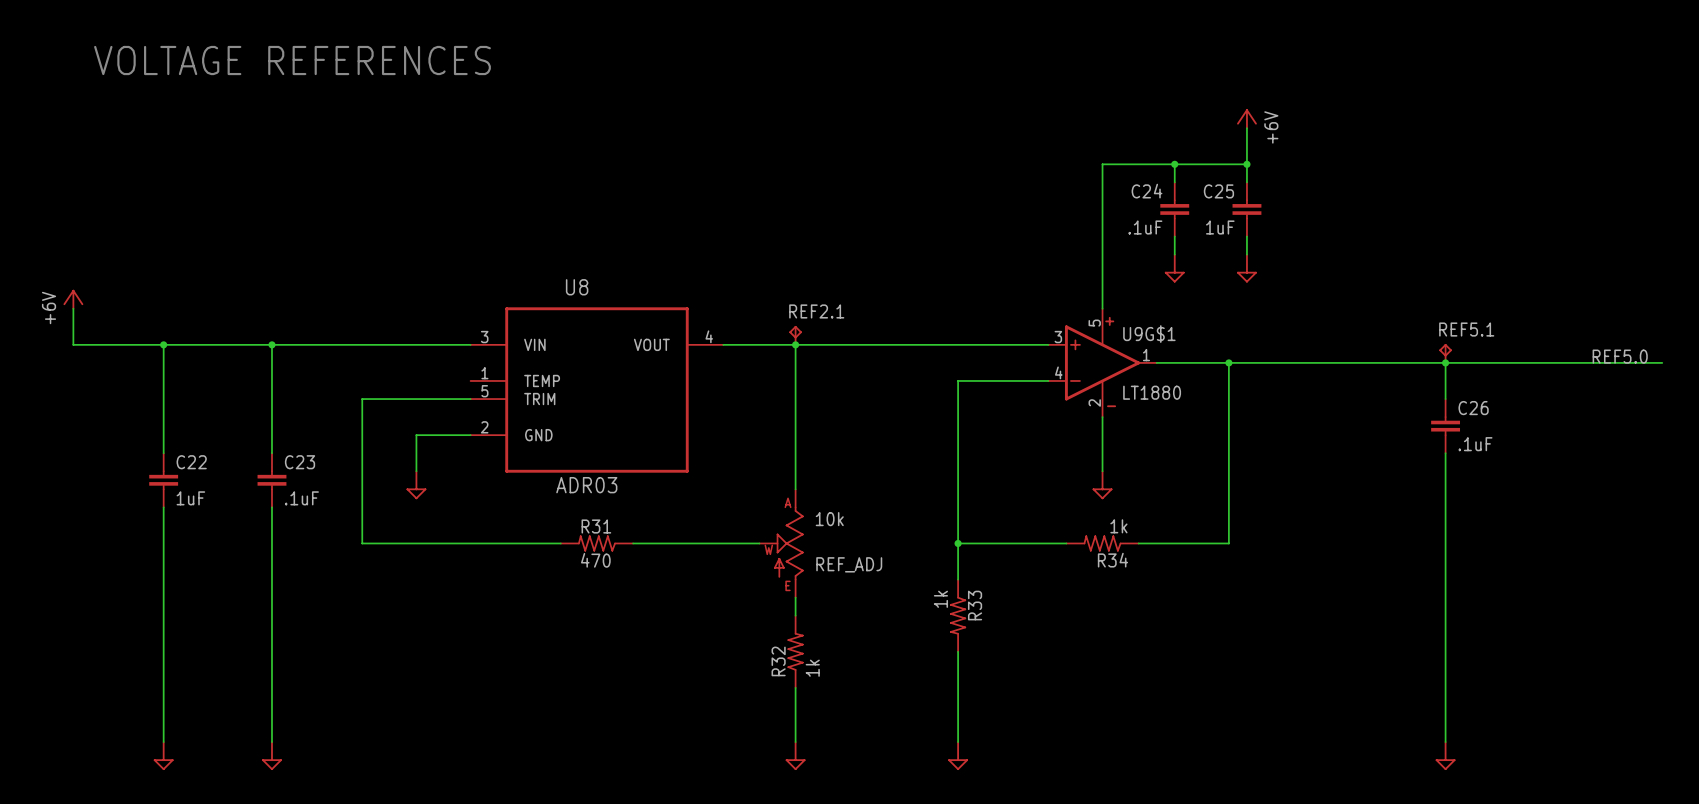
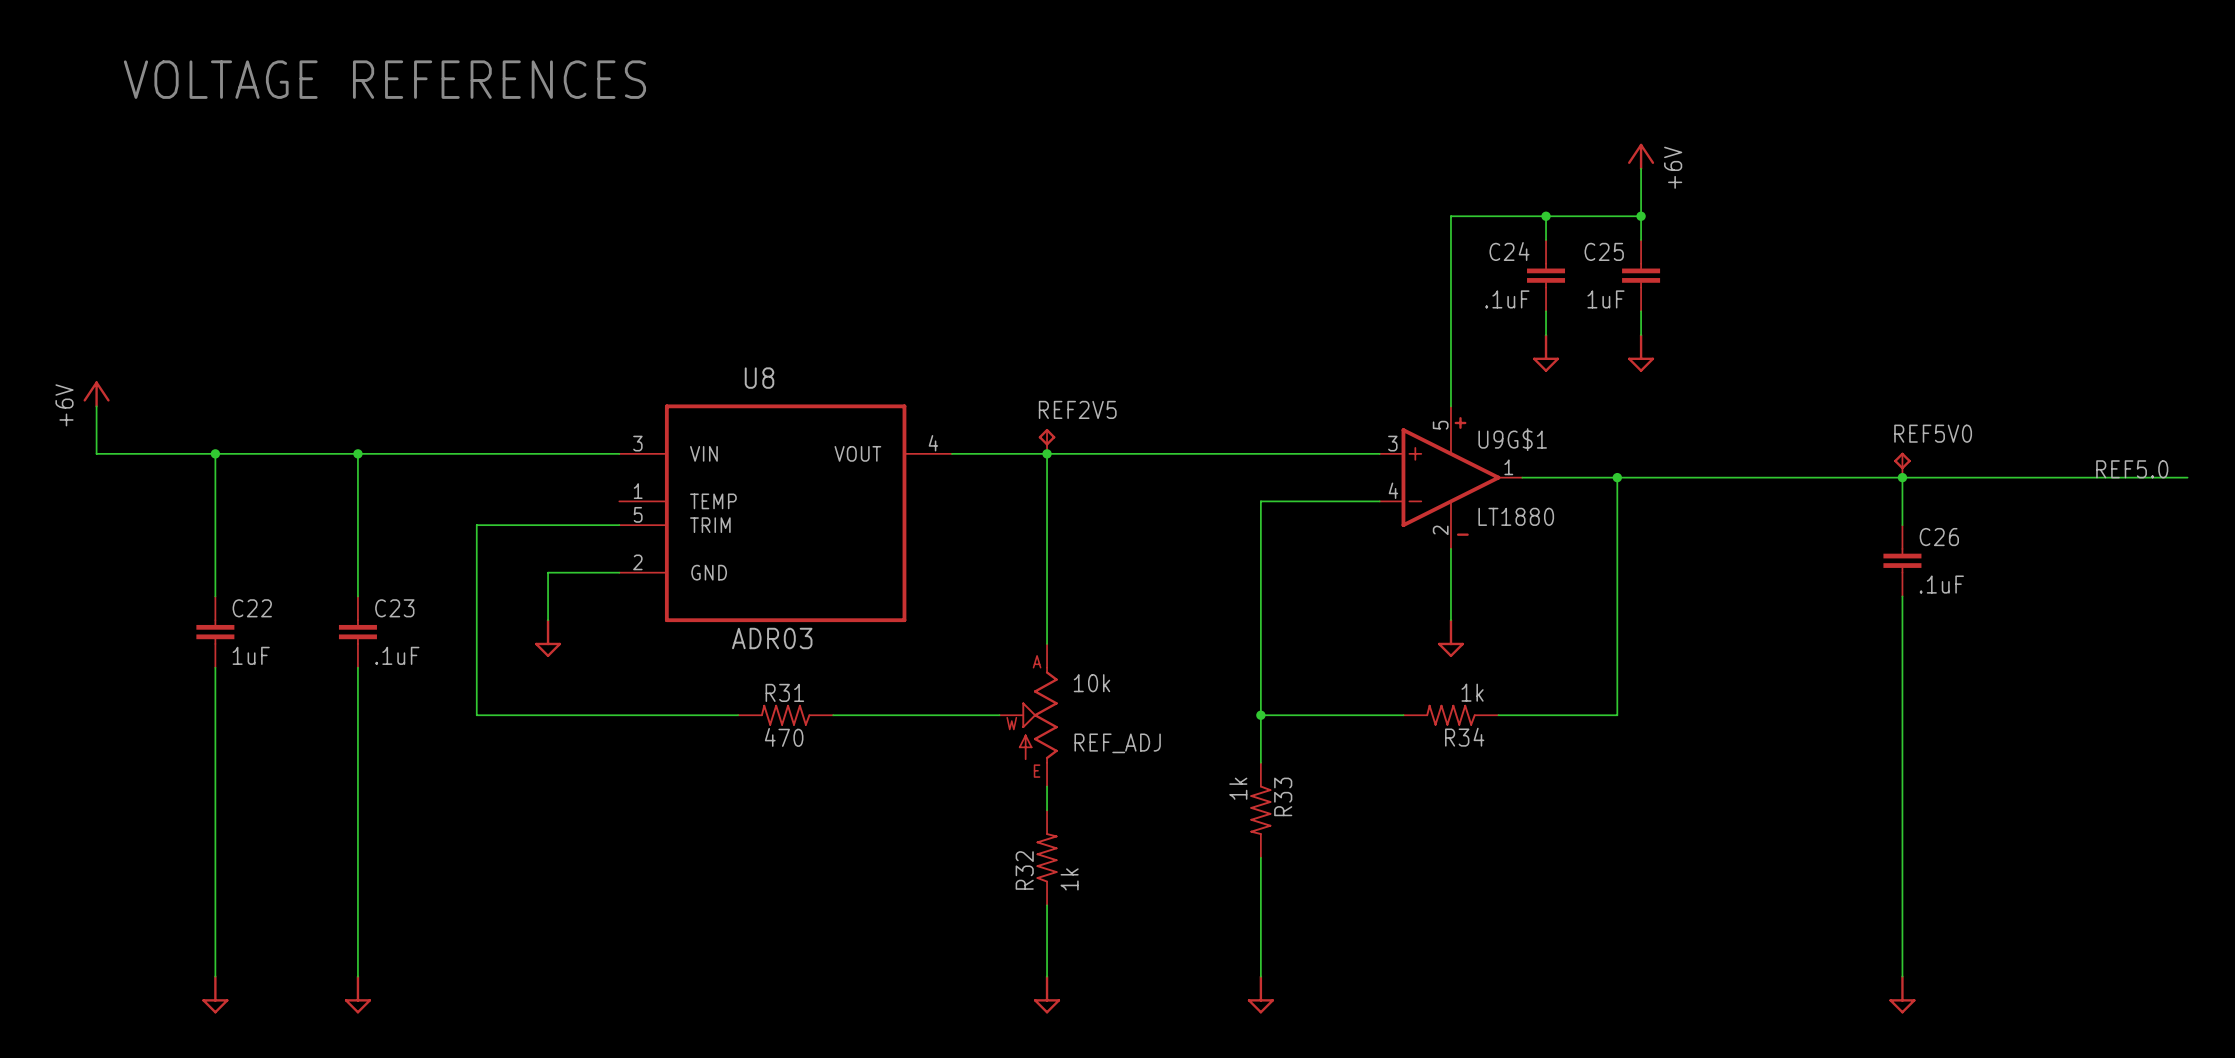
REF2.1 name: REF2.1 (816, 311) -> REF2V5 (1077, 409)
REF5.1 name: REF5.1 (1466, 329) -> REF5V0 (1933, 433)

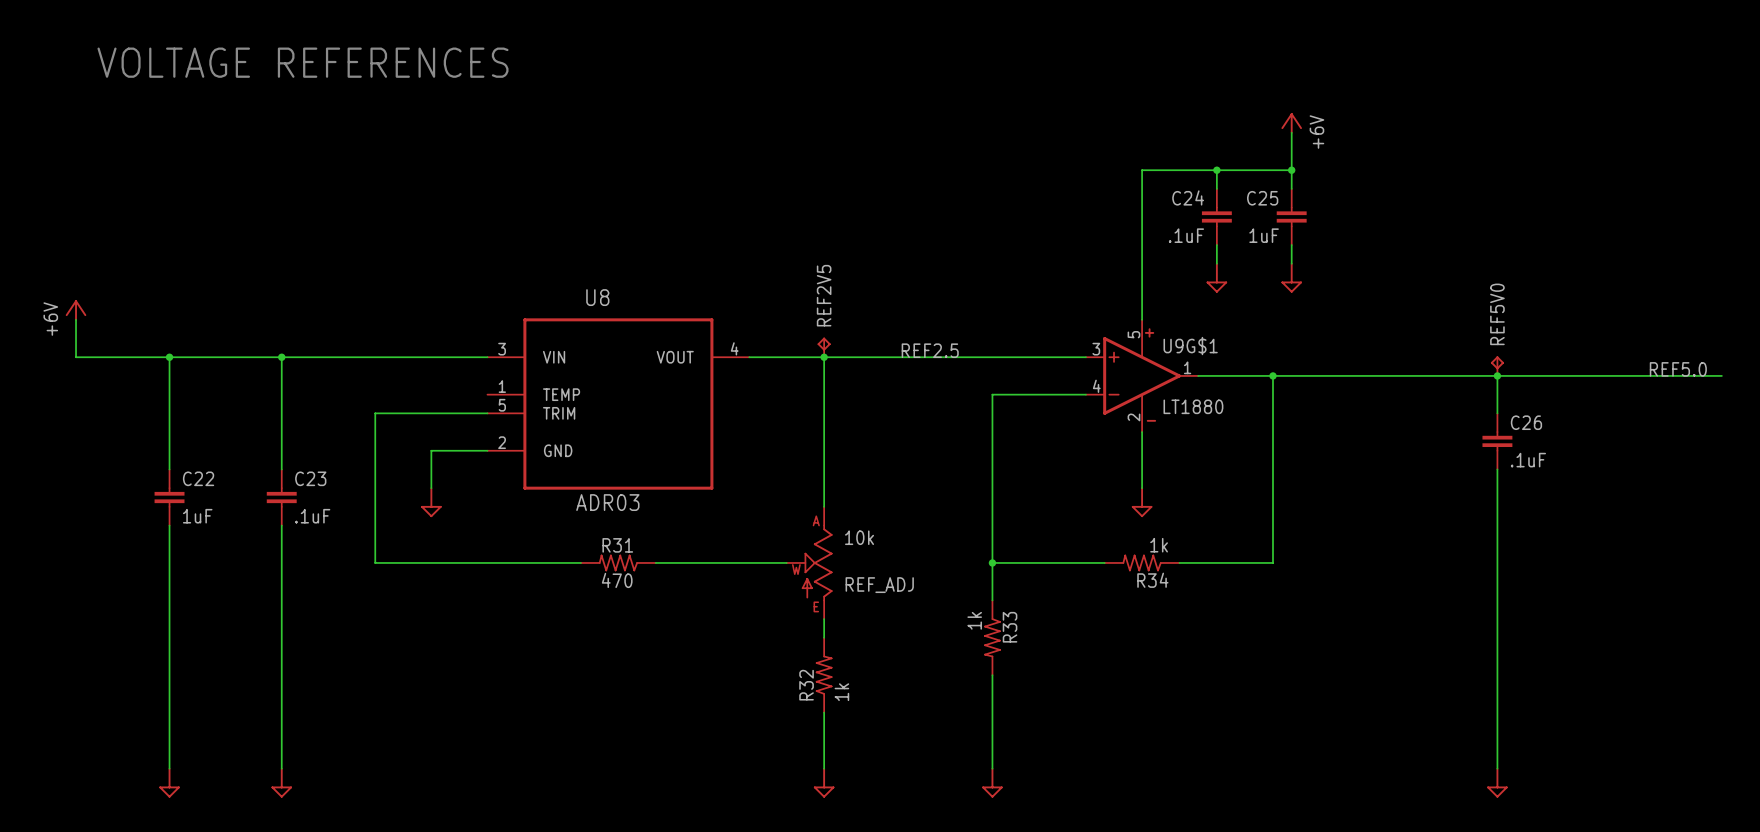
REF2V5 name rotation: 0° (1077, 409) -> 90° counterclockwise (824, 295)
REF5V0 name rotation: 0° (1933, 433) -> 90° counterclockwise (1497, 314)
label: none -> REF2.5 (930, 350)

